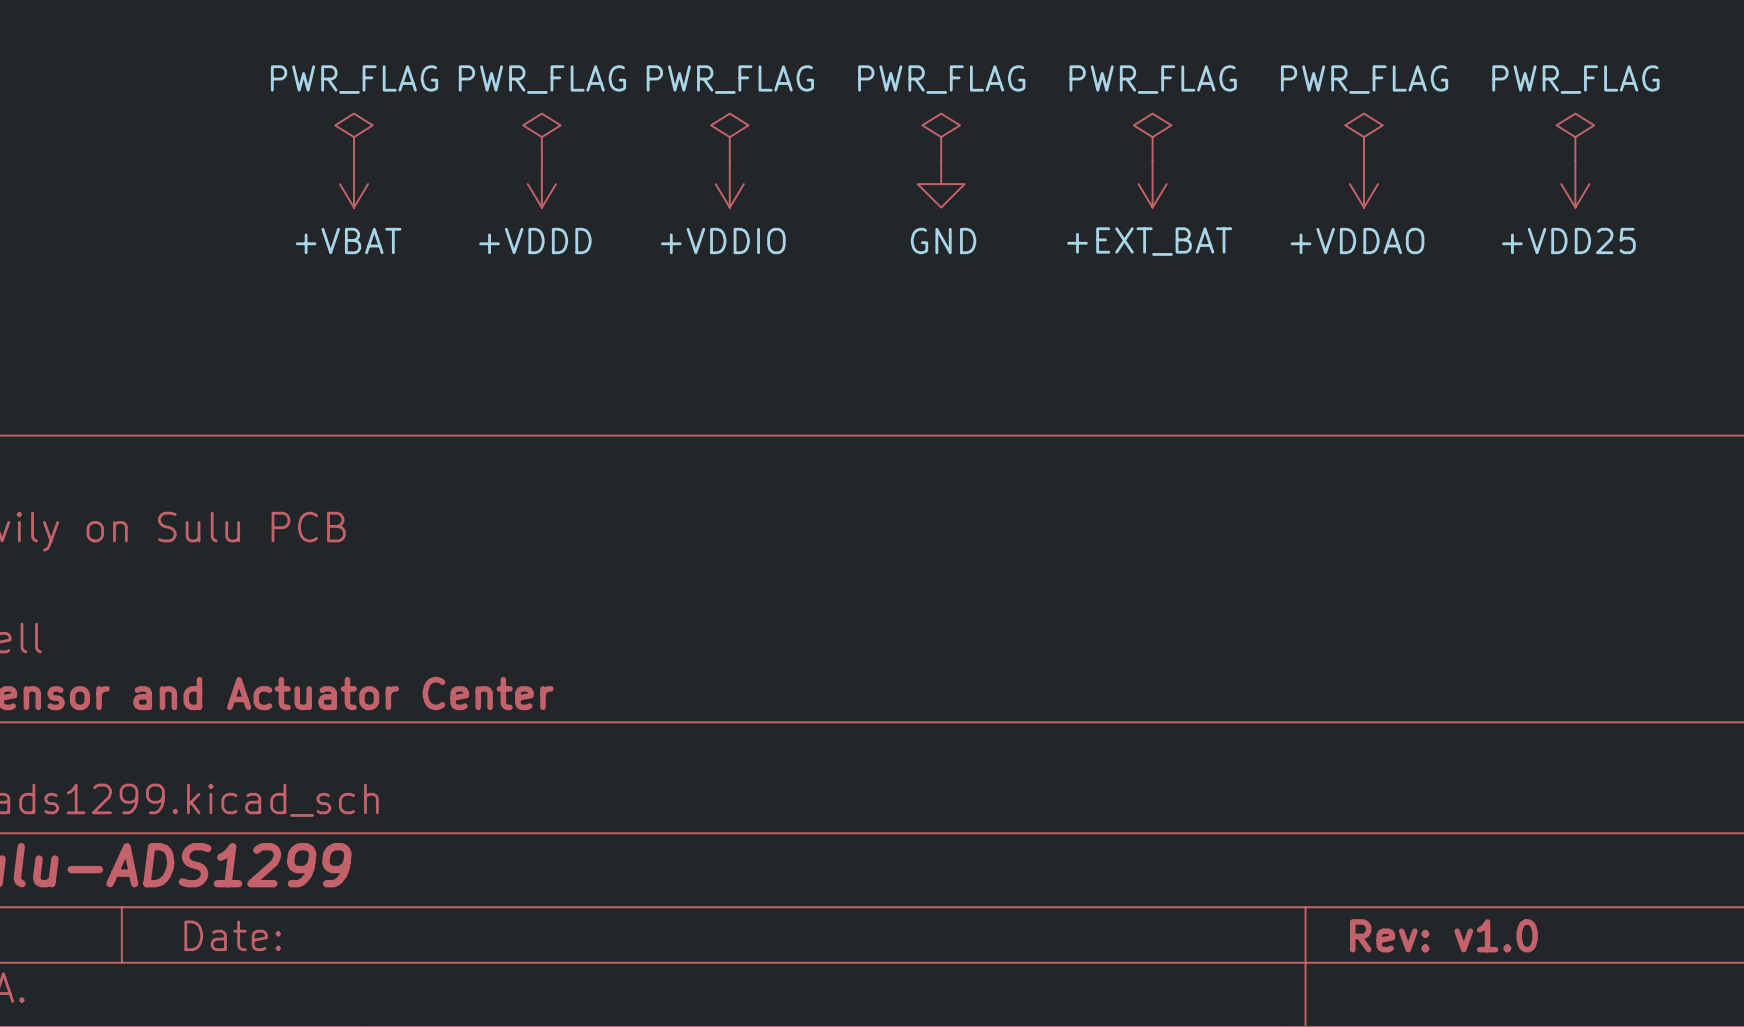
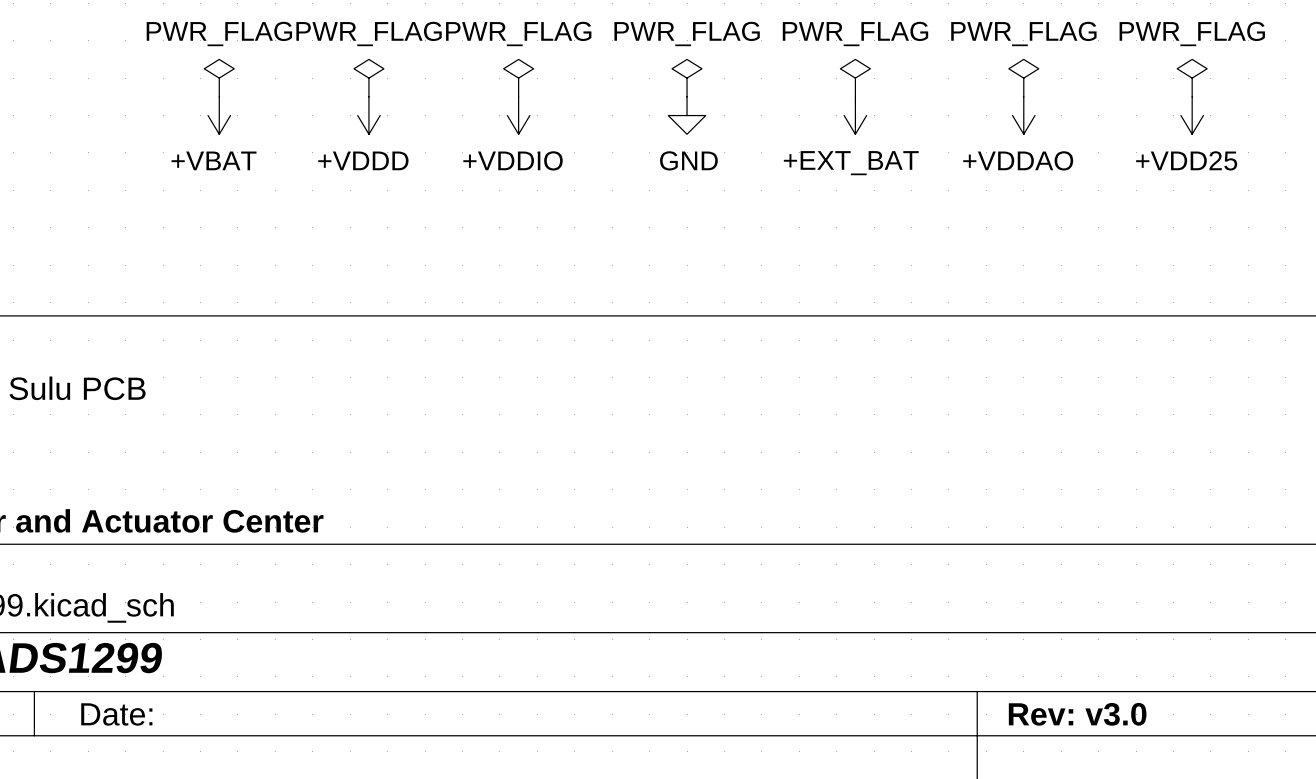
title block: Rev: v1.0 (1443, 935) -> Rev: v3.0 (1077, 714)

